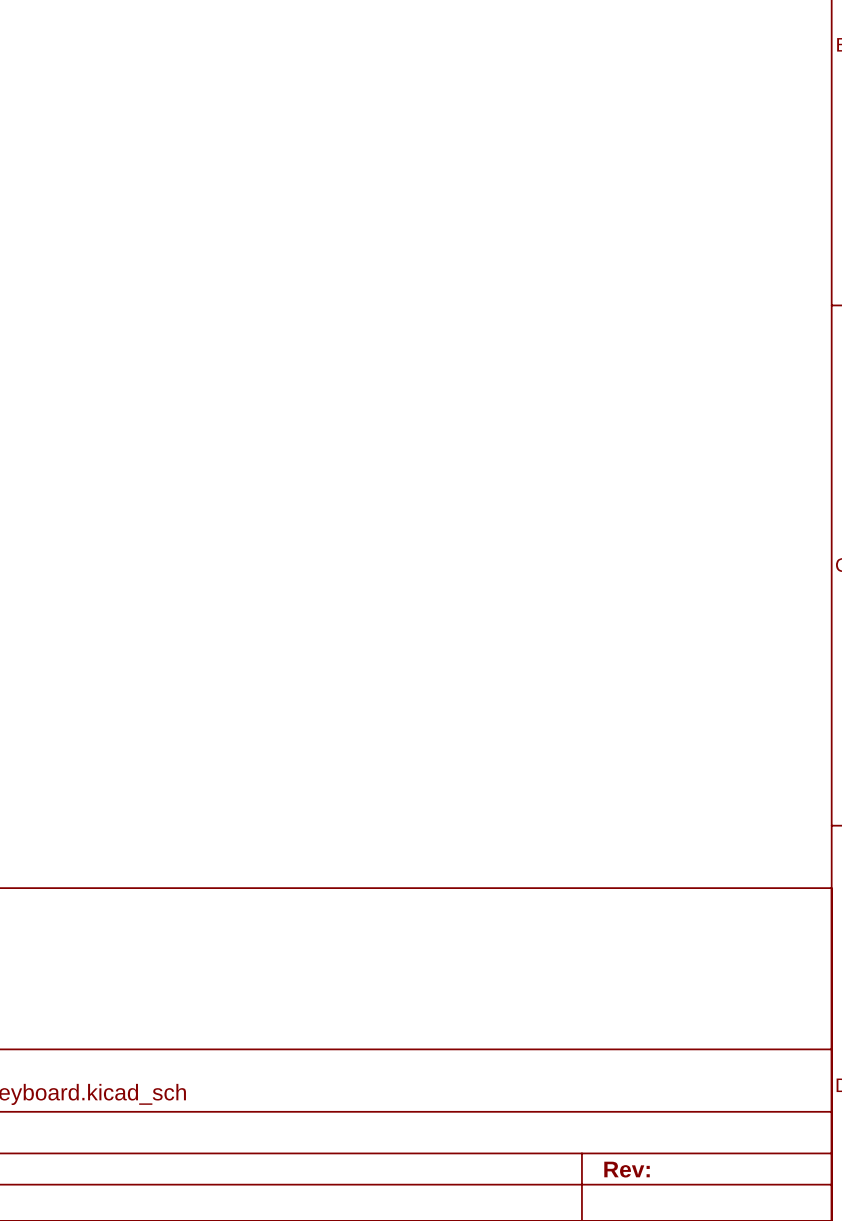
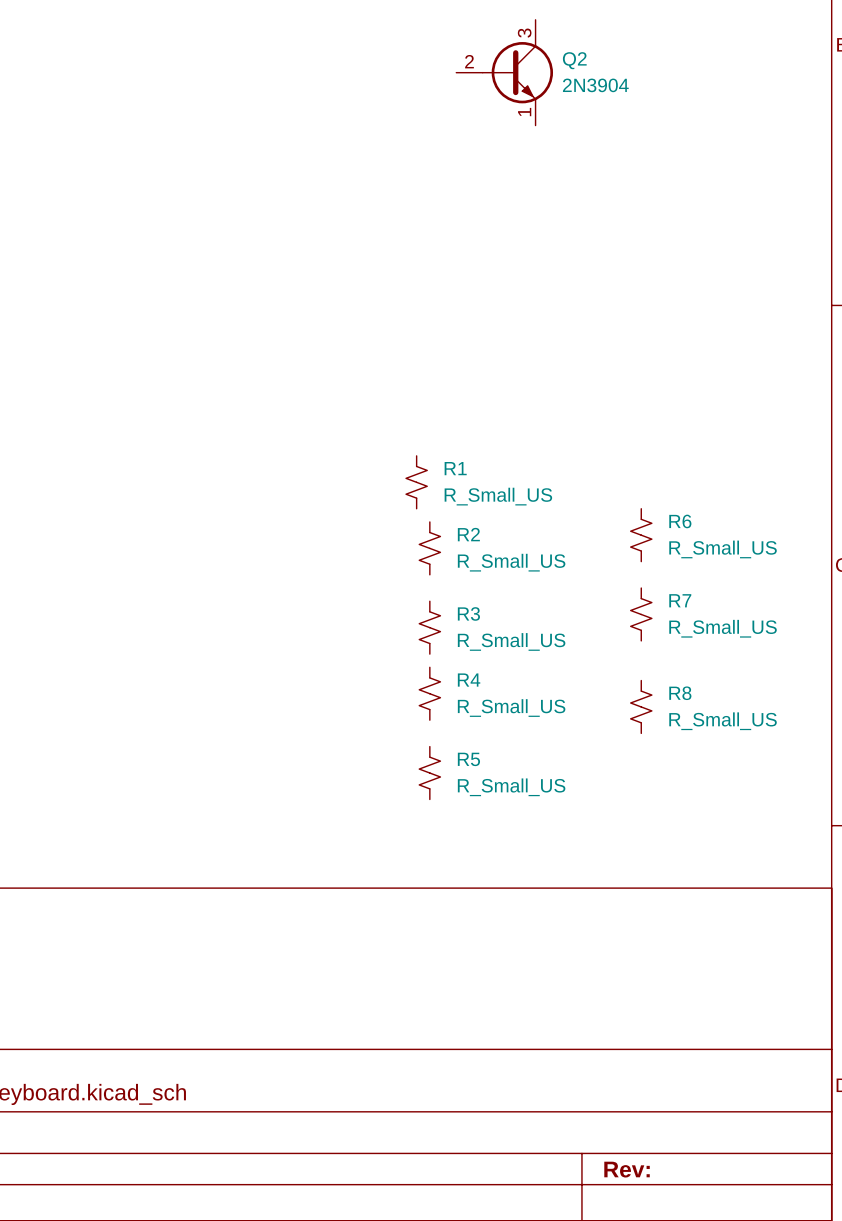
Q2: none -> 2N3904 (504, 72)
R1: none -> R_Small_US (416, 482)
R6: none -> R_Small_US (641, 535)
R2: none -> R_Small_US (429, 548)
R7: none -> R_Small_US (641, 614)
R3: none -> R_Small_US (429, 627)
R4: none -> R_Small_US (429, 693)
R8: none -> R_Small_US (641, 706)
R5: none -> R_Small_US (429, 773)

